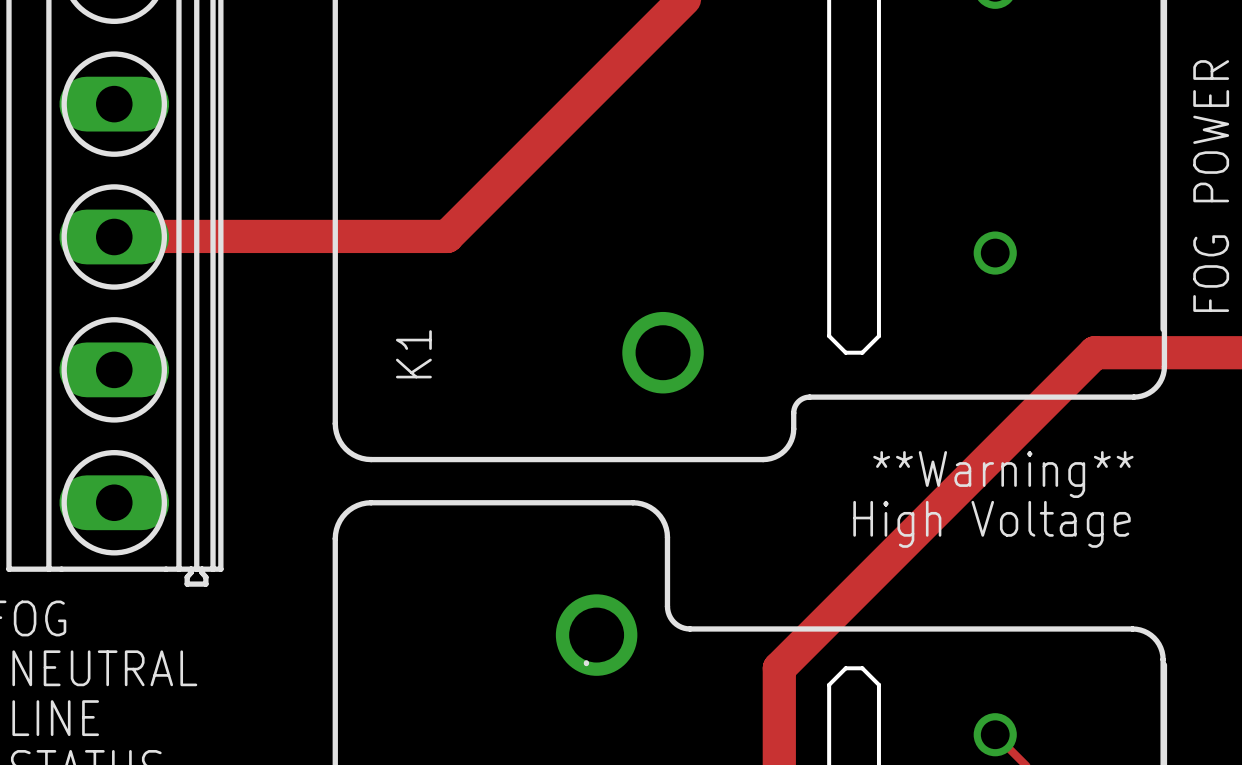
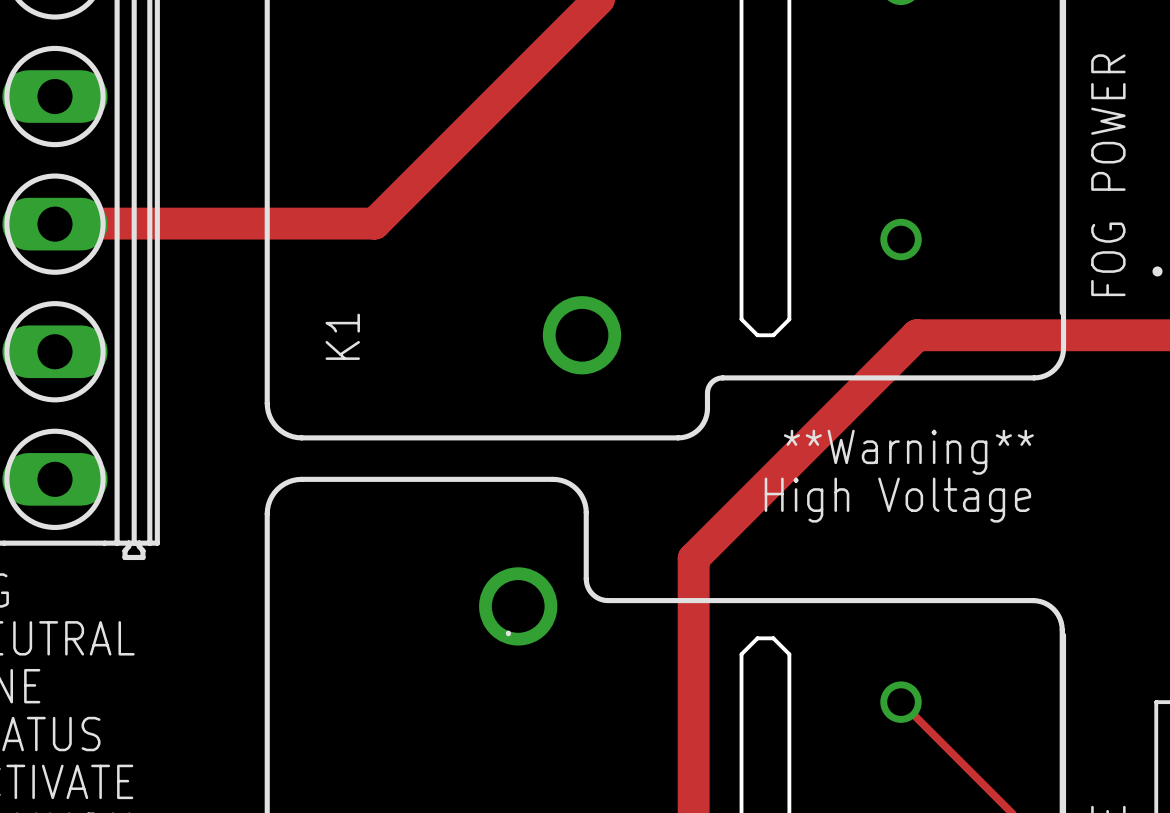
track: (1094, 352) (779, 668) -> (996, 335) (916, 335) (693, 558) (693, 638)

